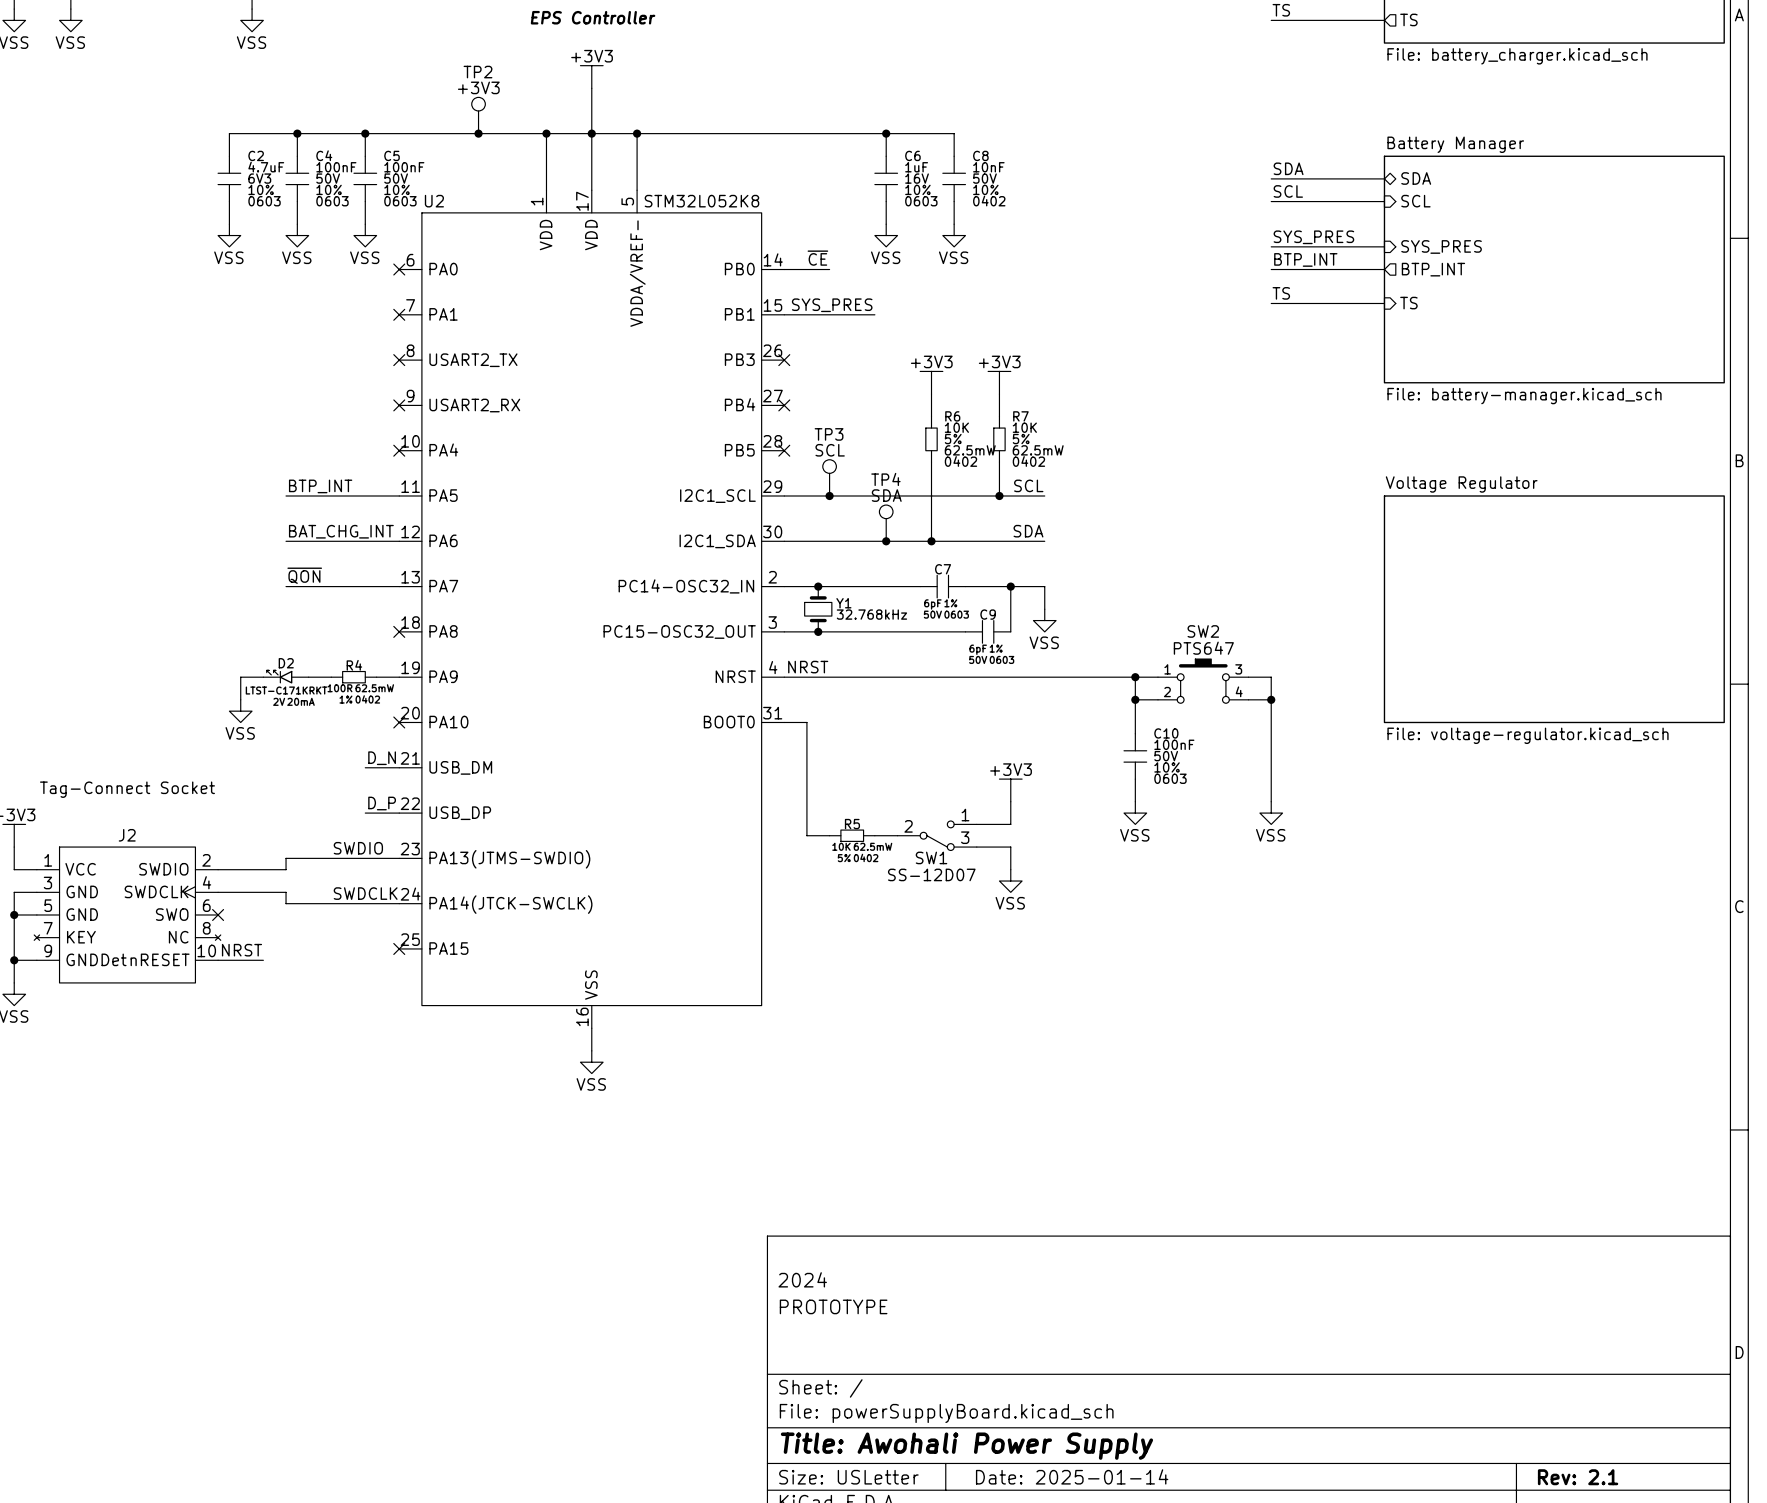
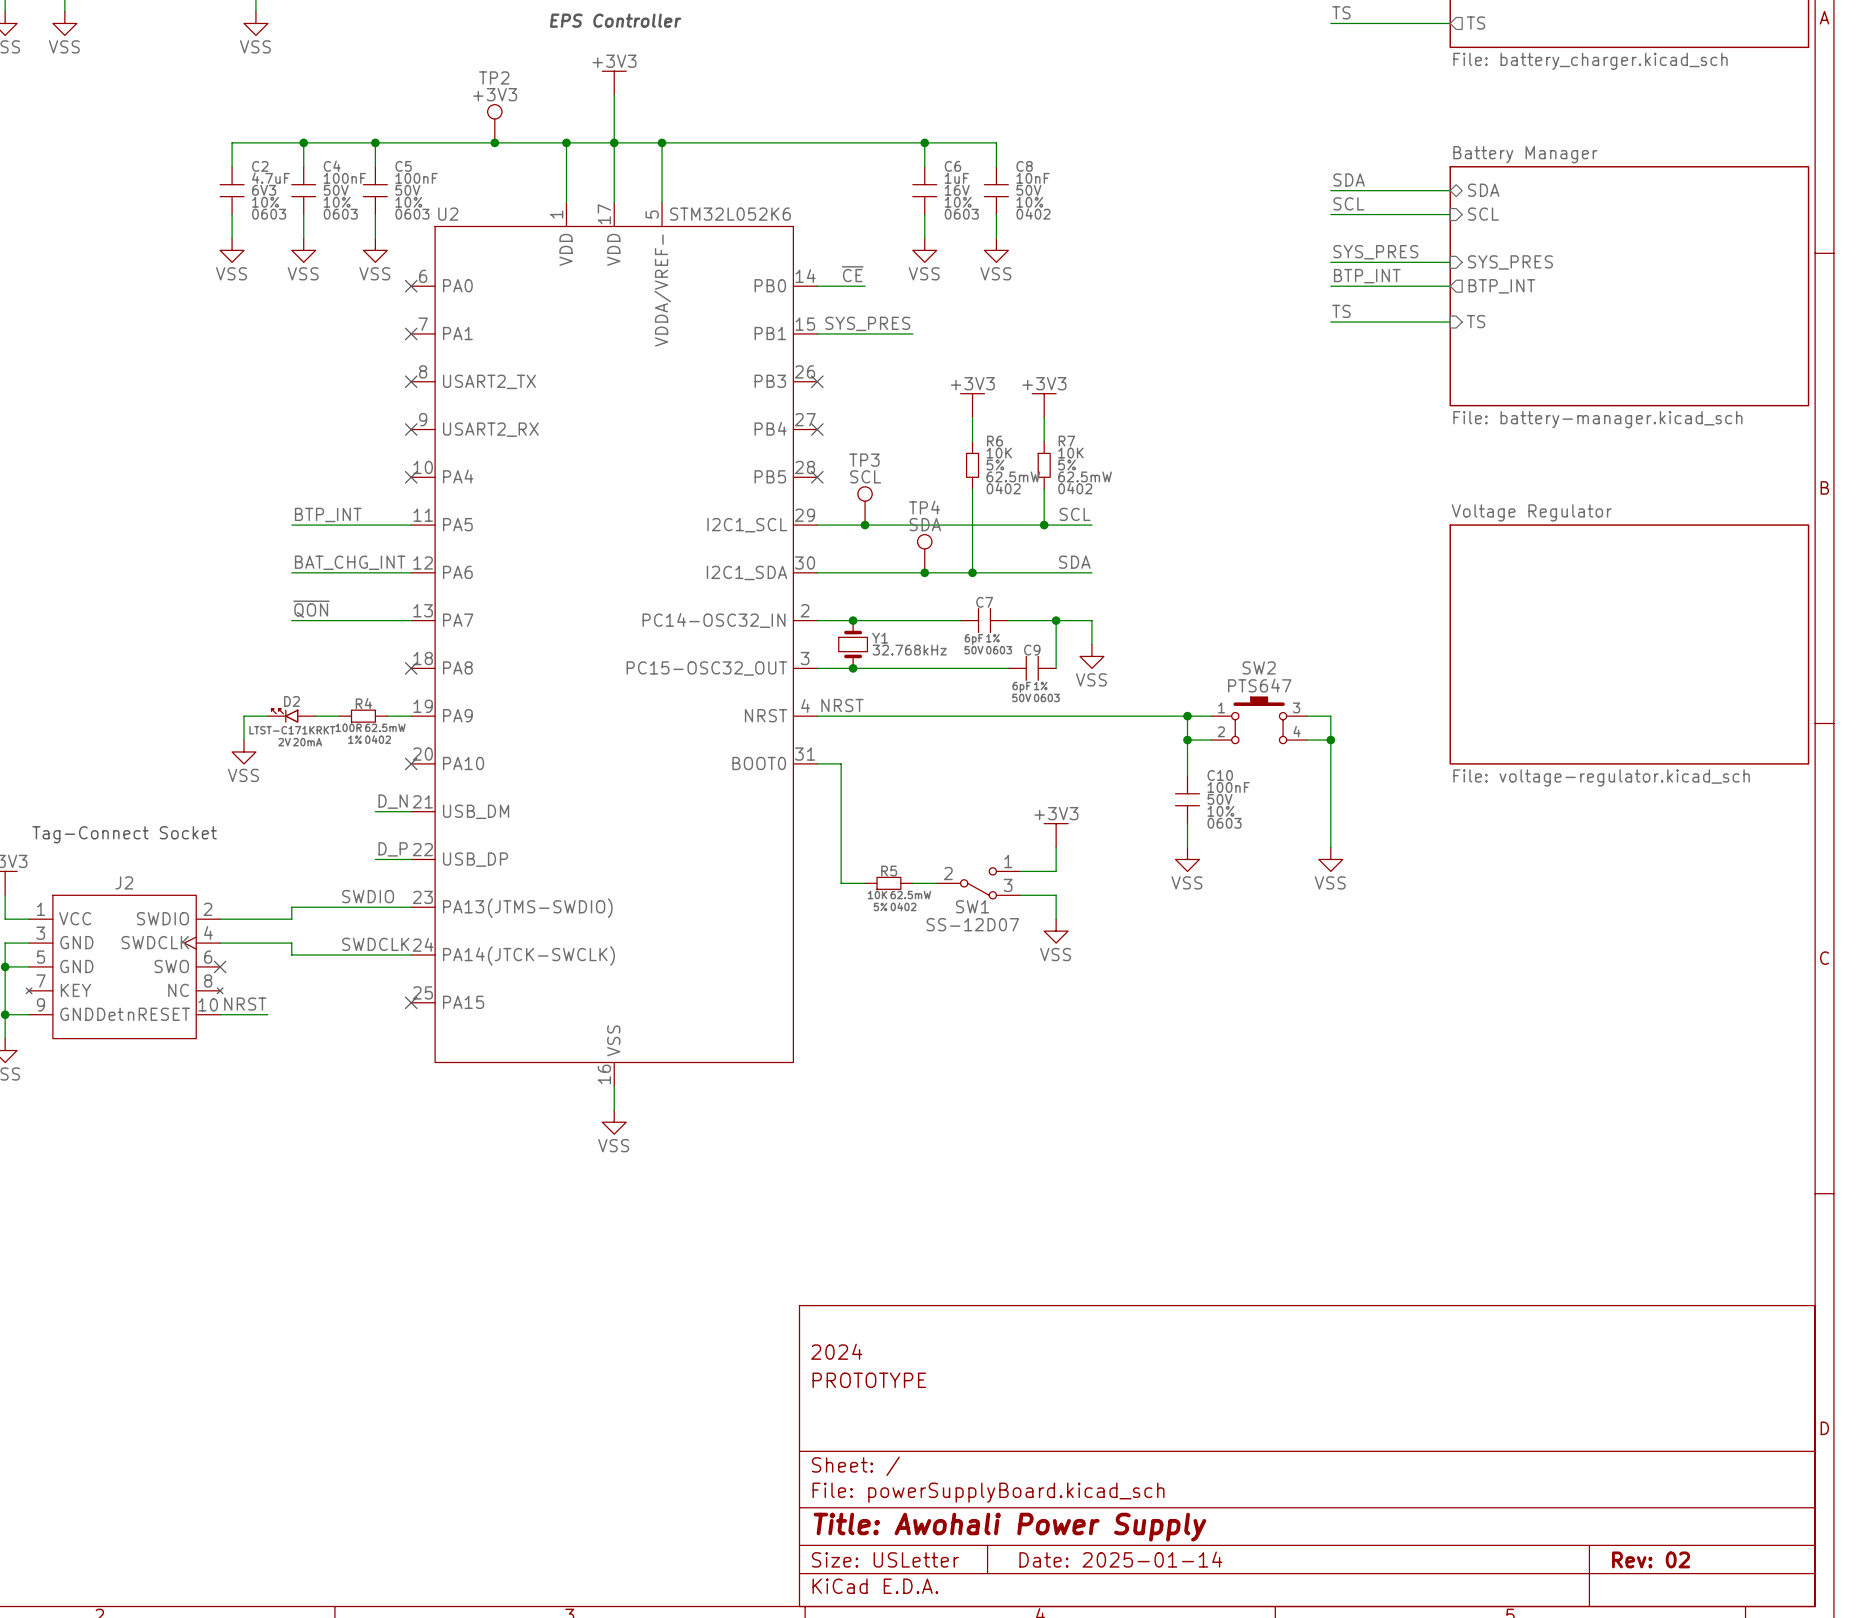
U2 value: STM32L052K8 (701, 201) -> STM32L052K6 (730, 214)
title block: Rev: 2.1 (1578, 1477) -> Rev: 02 (1651, 1559)

